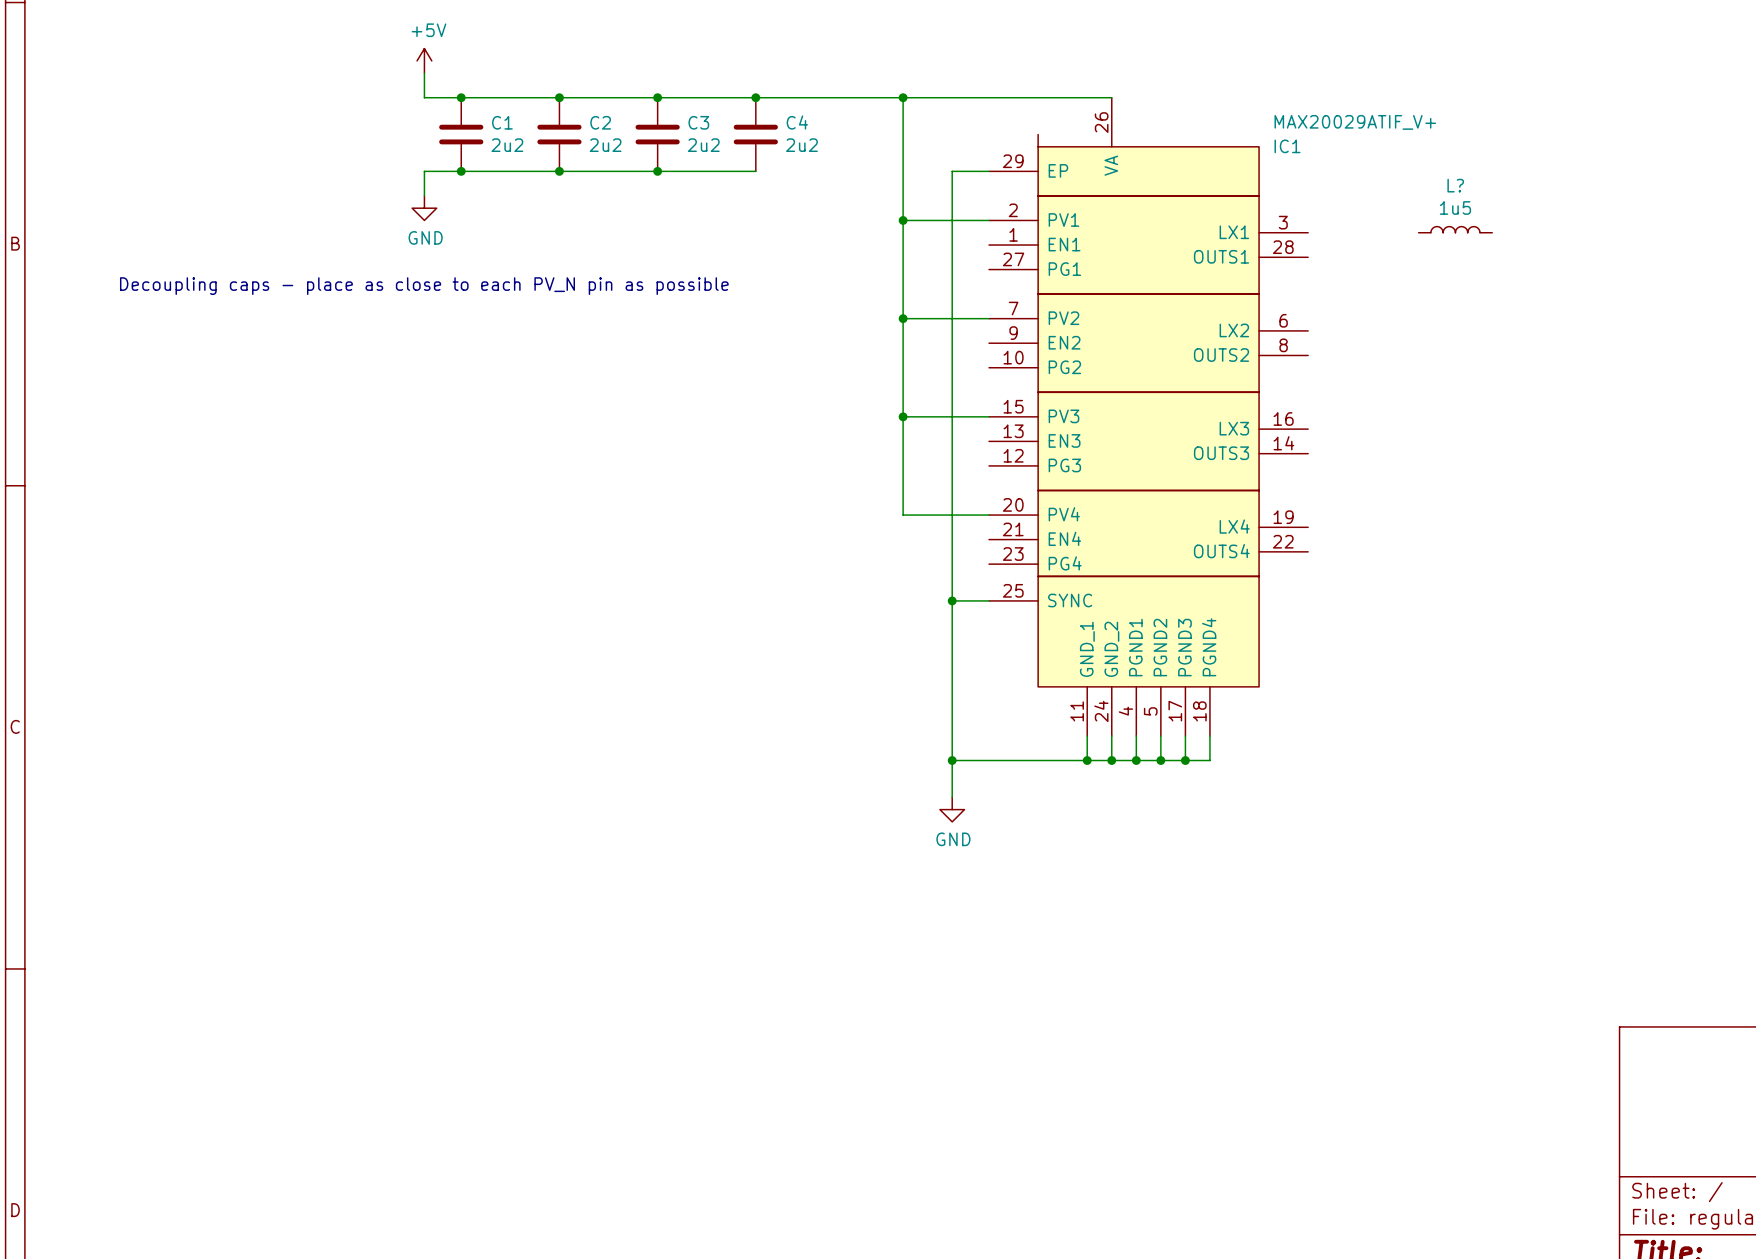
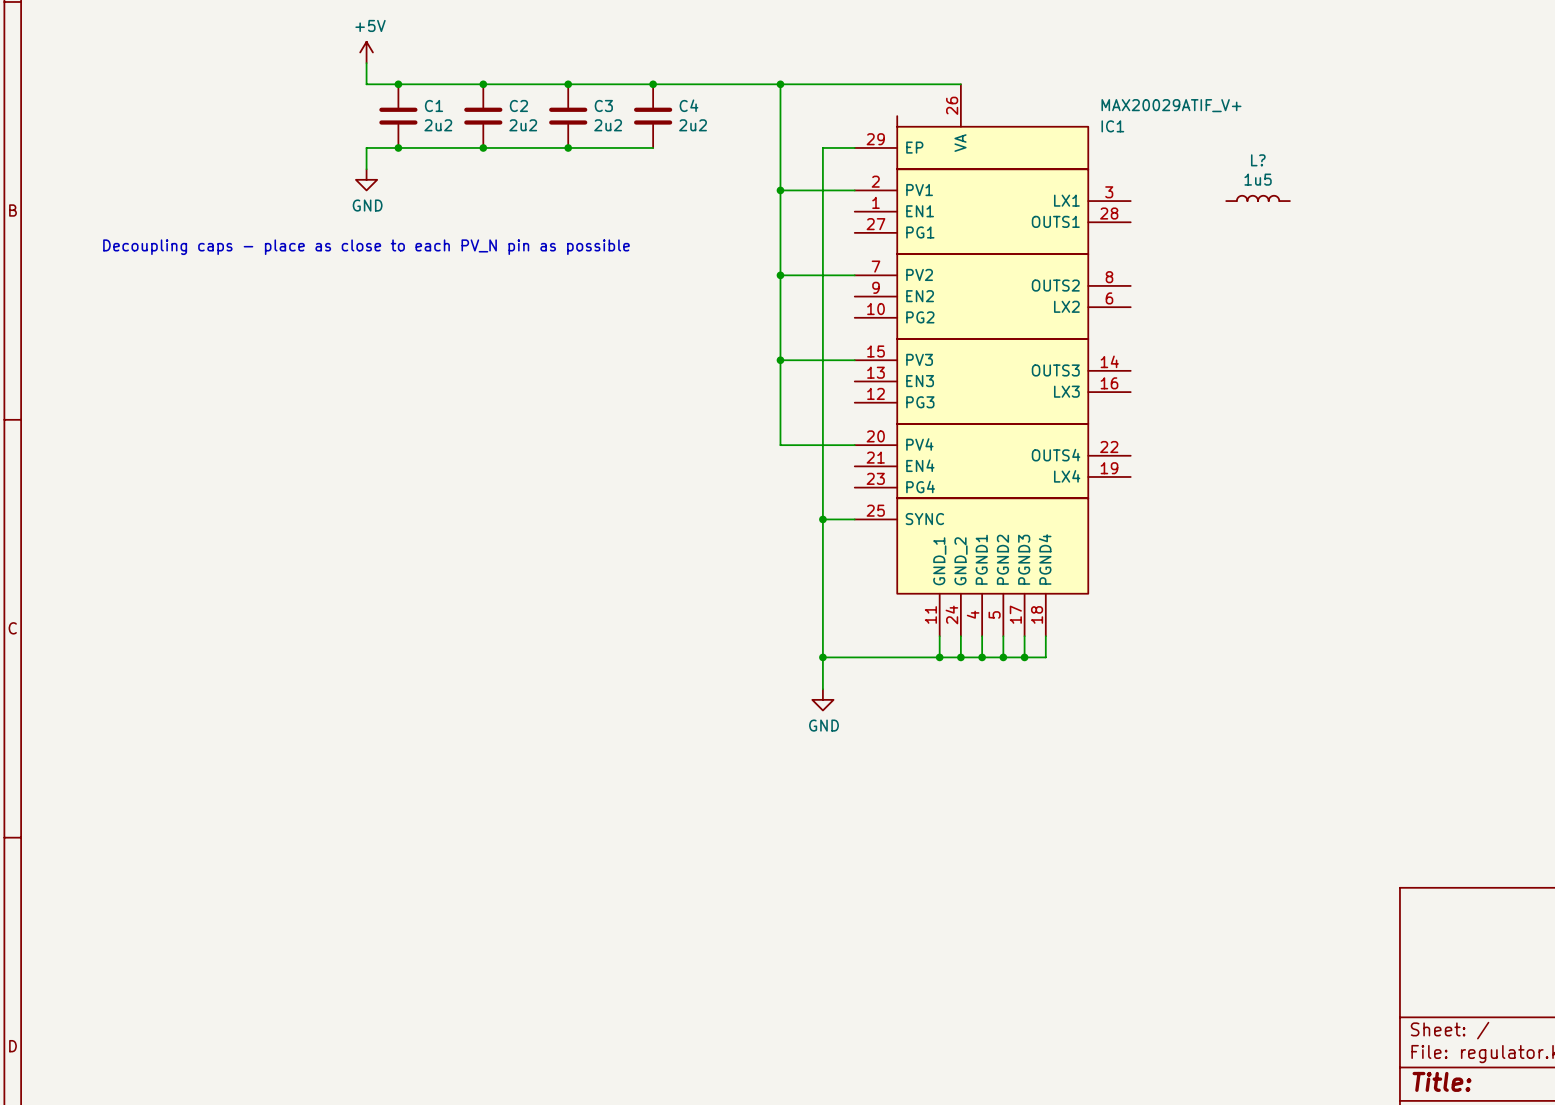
IC1 symbol: [989, 97, 1309, 736] -> [854, 84, 1131, 637]

